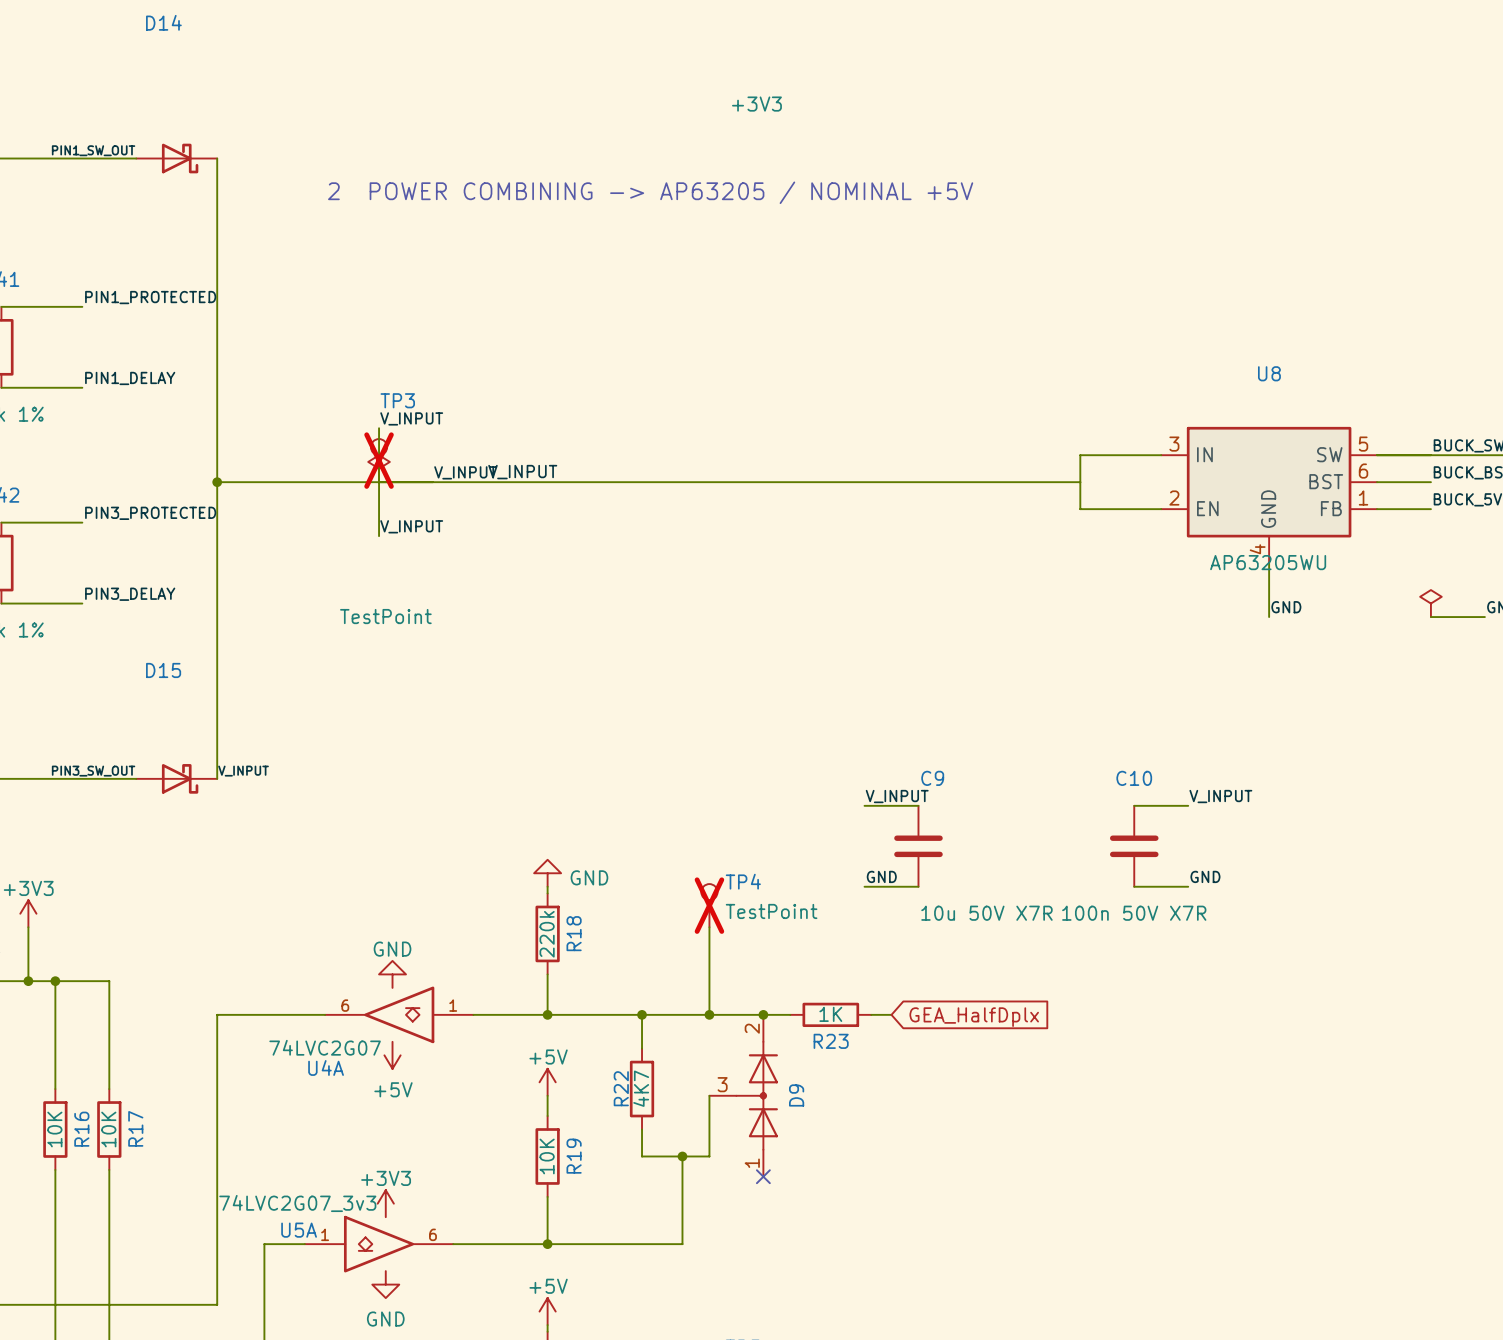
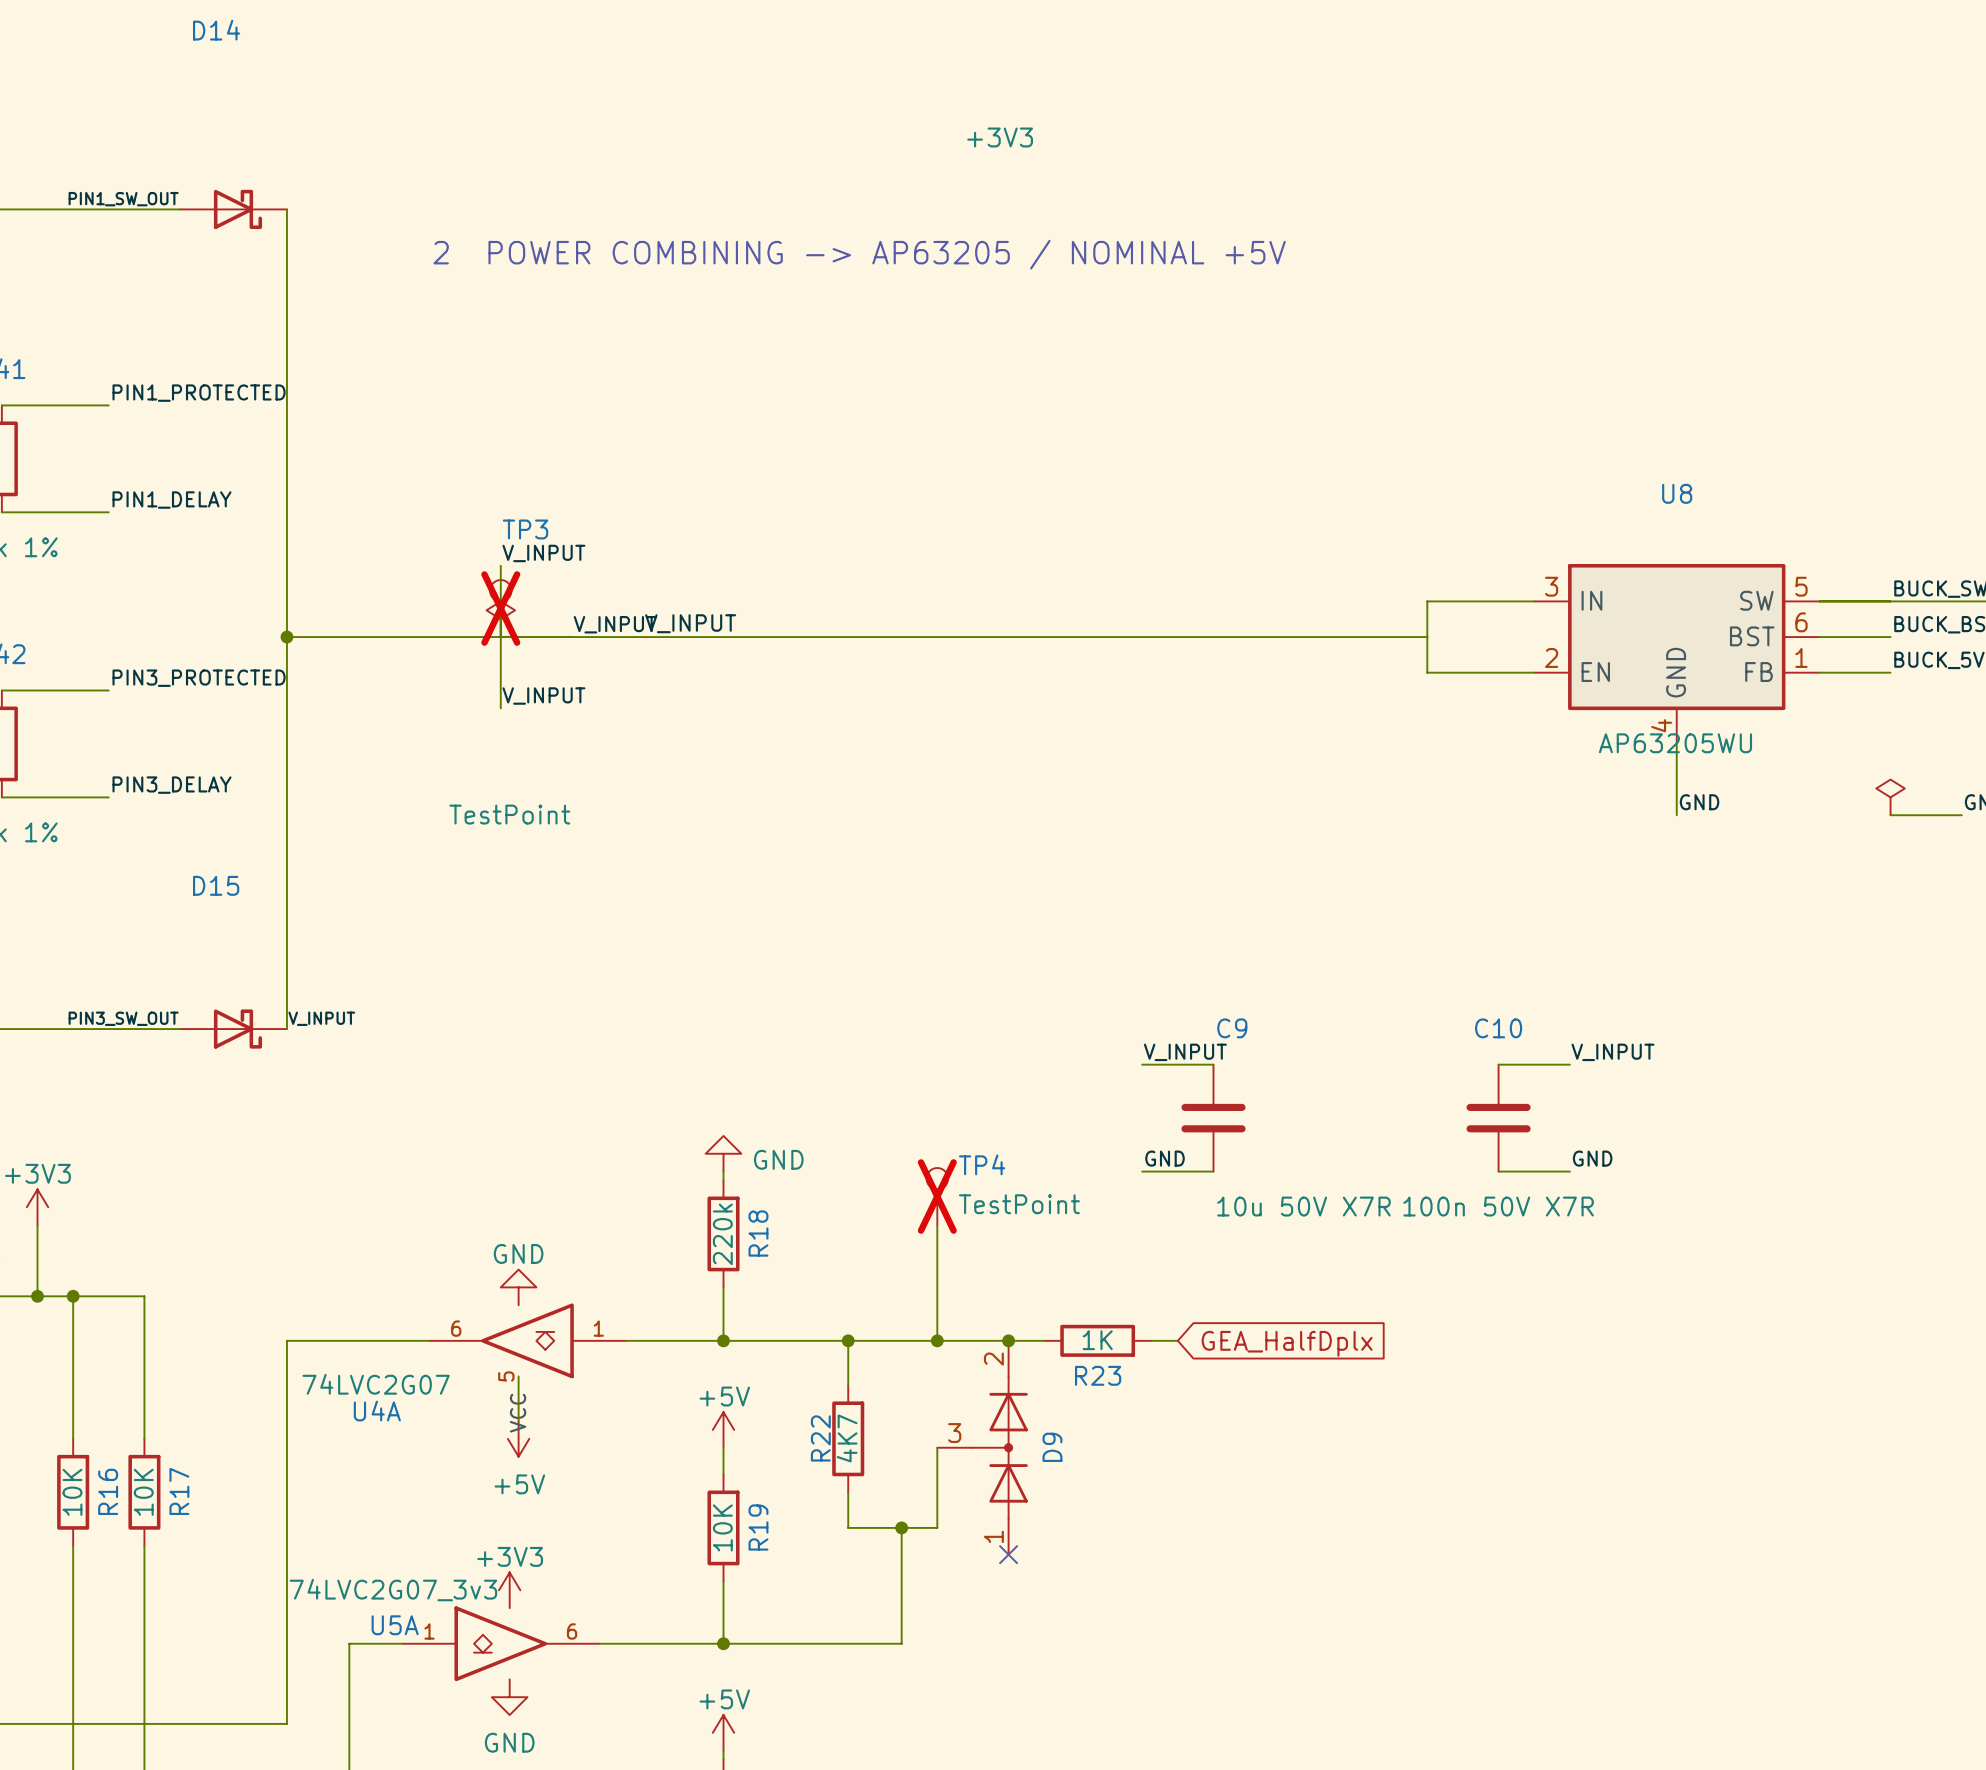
U4A pin number: none -> 5 (506, 1376)
U4A value position: 74LVC2G07 (325, 1047) -> 74LVC2G07 (376, 1384)
power symbol position: +5V (392, 1055) -> +5V (518, 1438)
U4A name position: U4A (326, 1067) -> U4A (377, 1411)
U4A pin name: none -> VCC (518, 1413)

